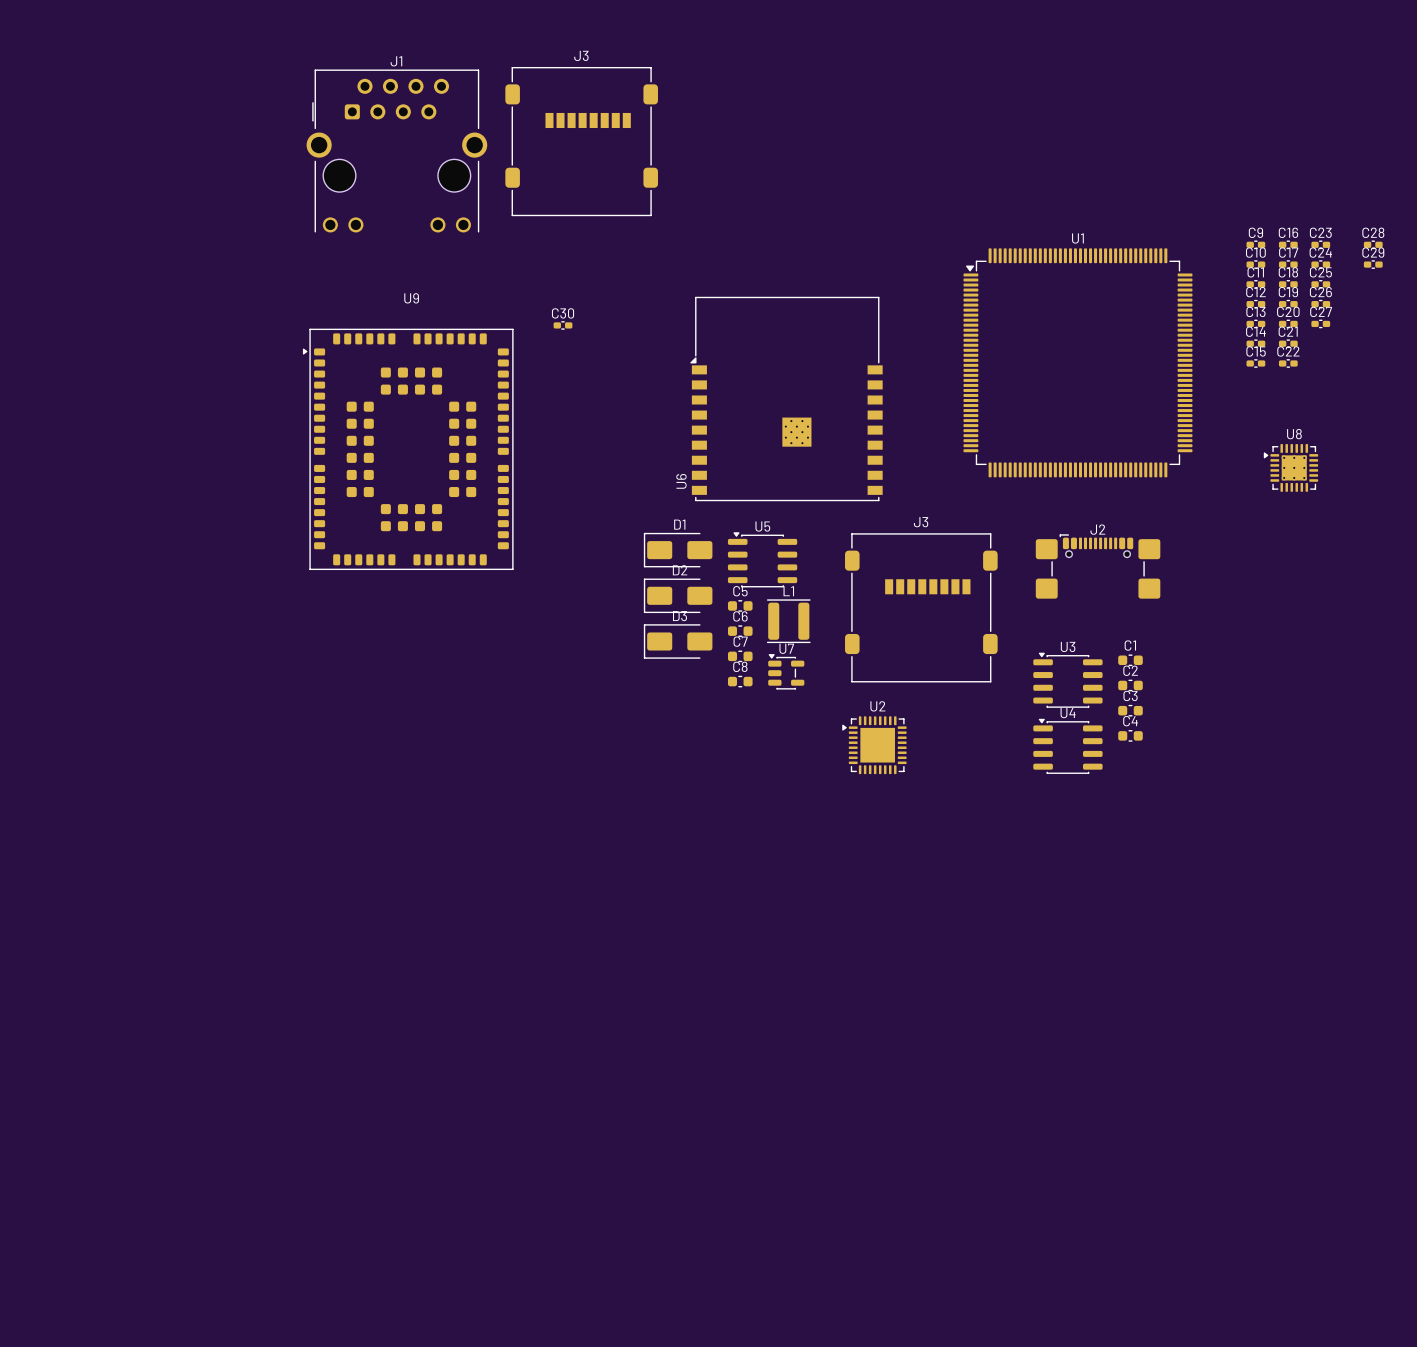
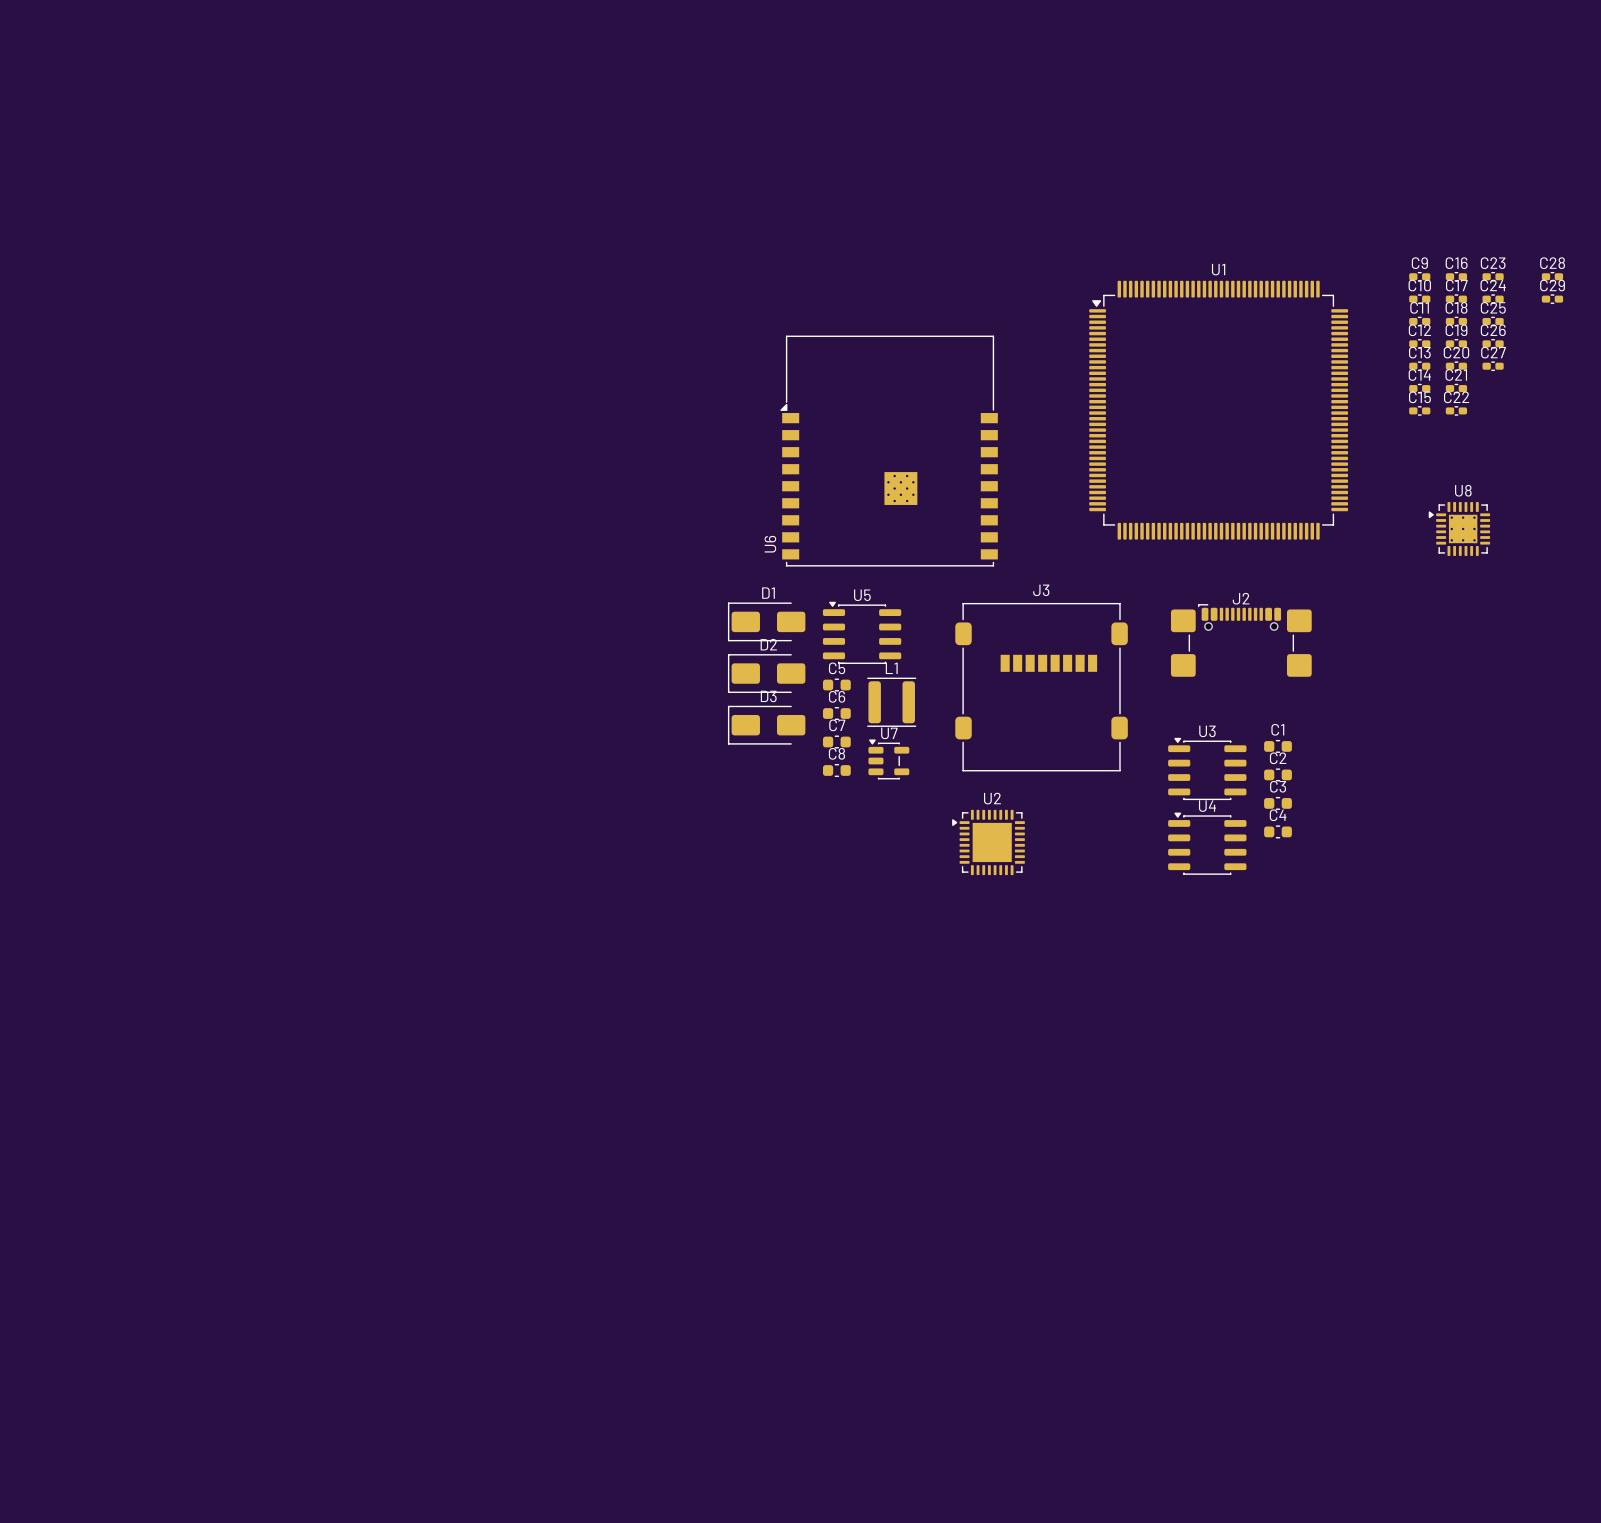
J3: (581, 141) -> none
J1: (396, 151) -> none
C30: (562, 325) -> none
U9: (408, 449) -> none

